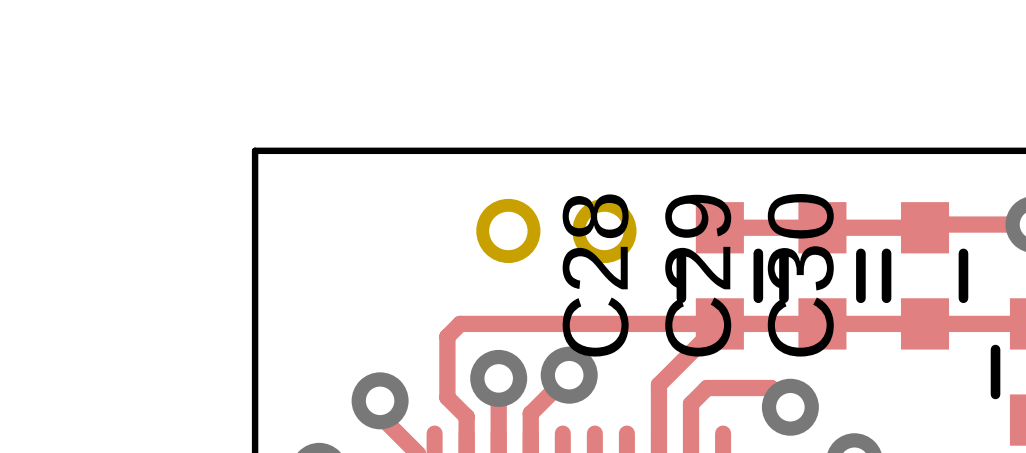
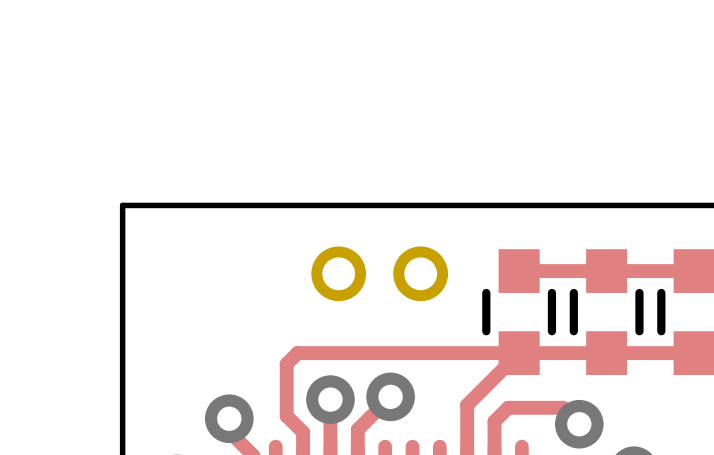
C28 name: C28 (595, 275) -> none
C29 name: C29 (698, 275) -> none
C30 name: C30 (800, 275) -> none

